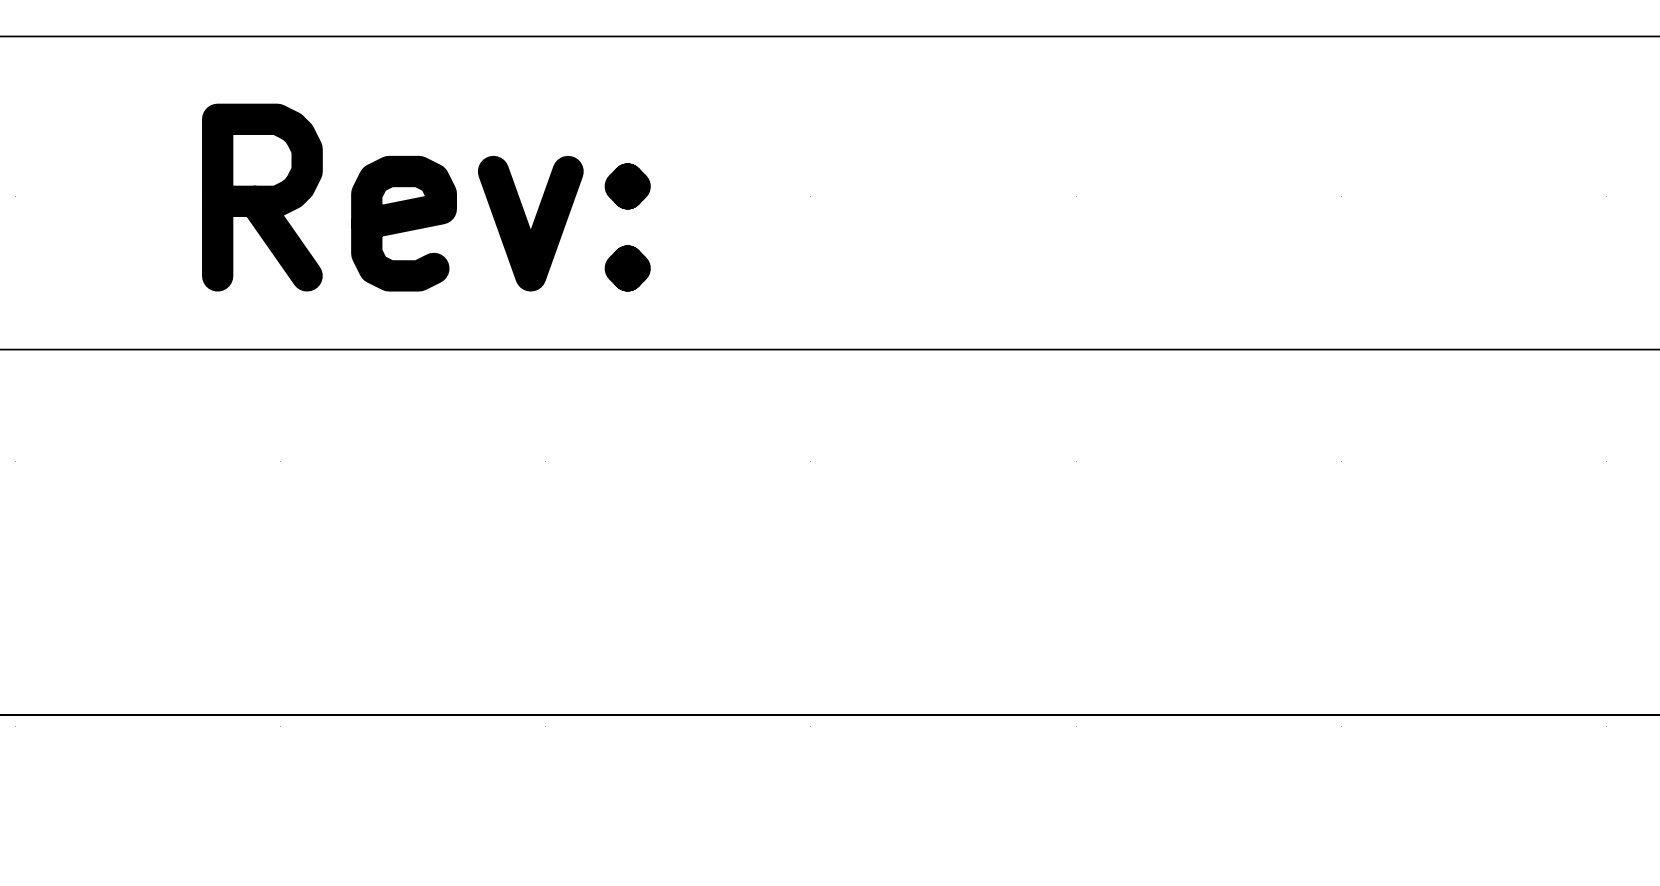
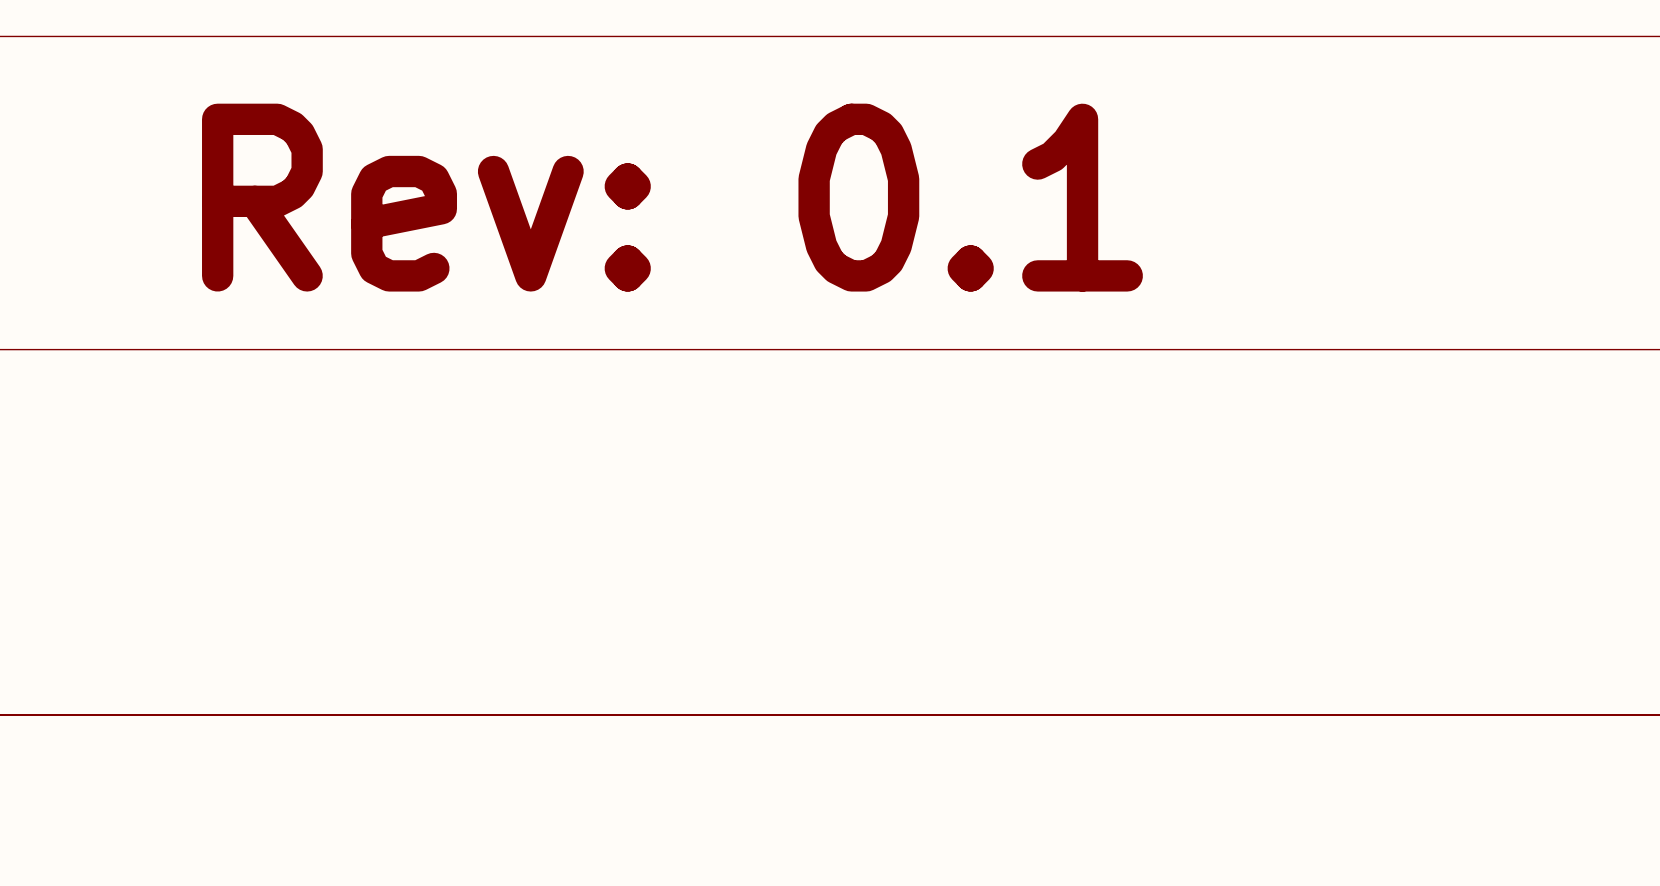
title block: Rev: (426, 197) -> Rev: 0.1 (672, 197)

